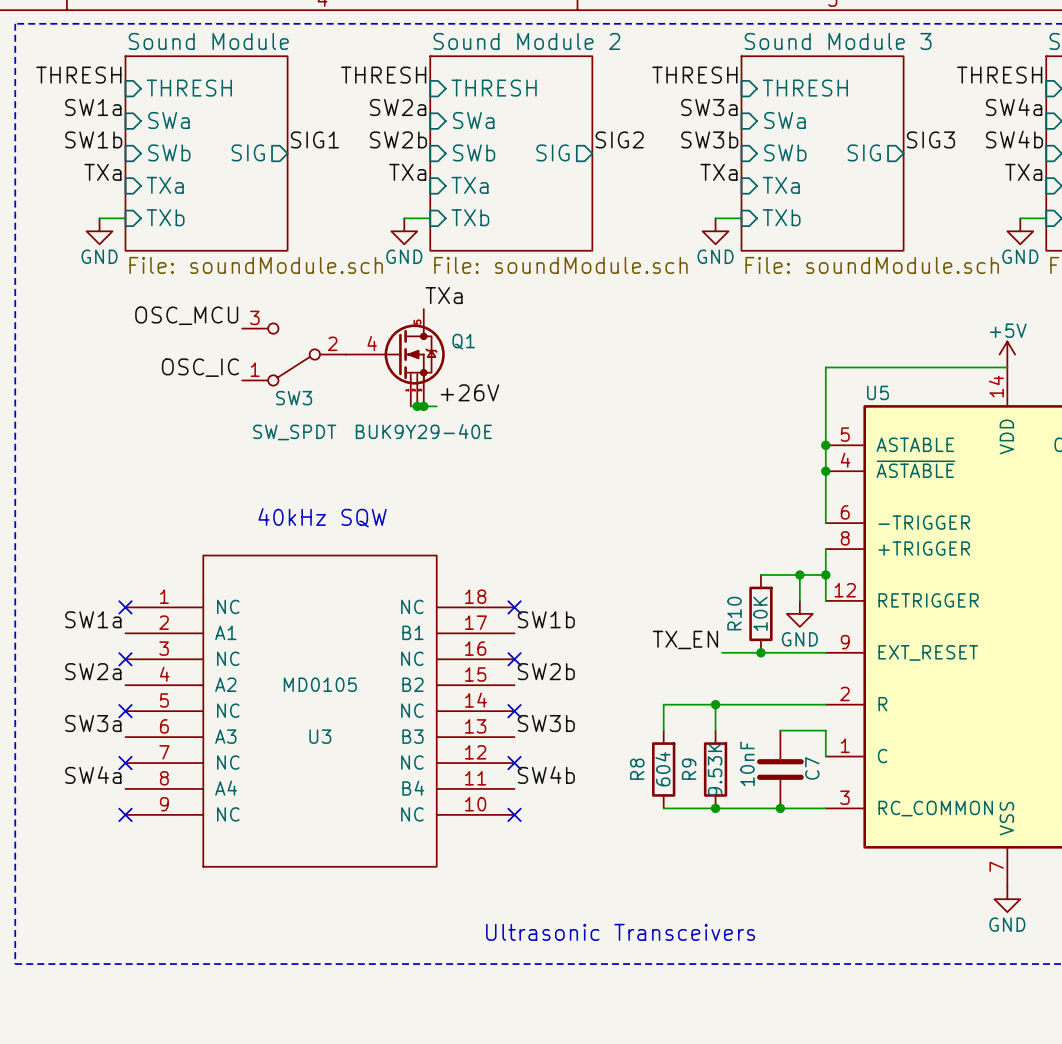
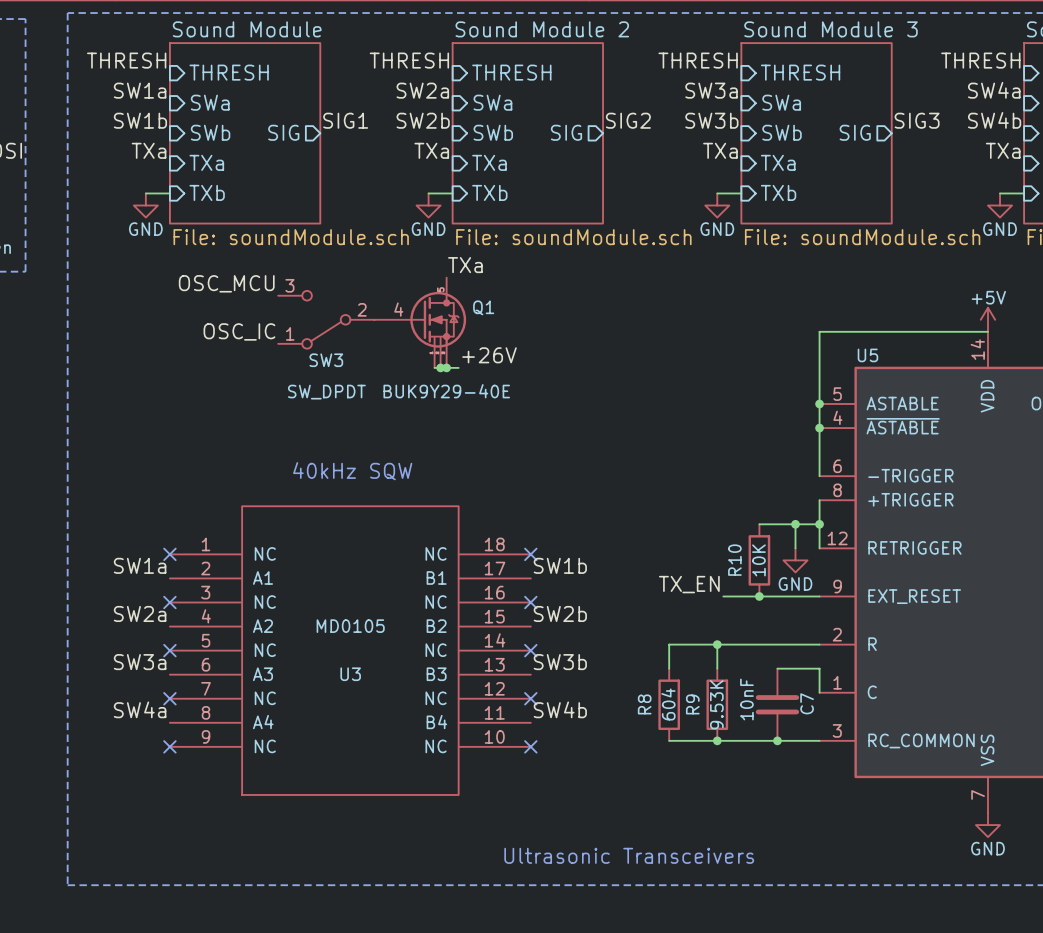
SW3 value: SW_SPDT (294, 432) -> SW_DPDT (326, 392)

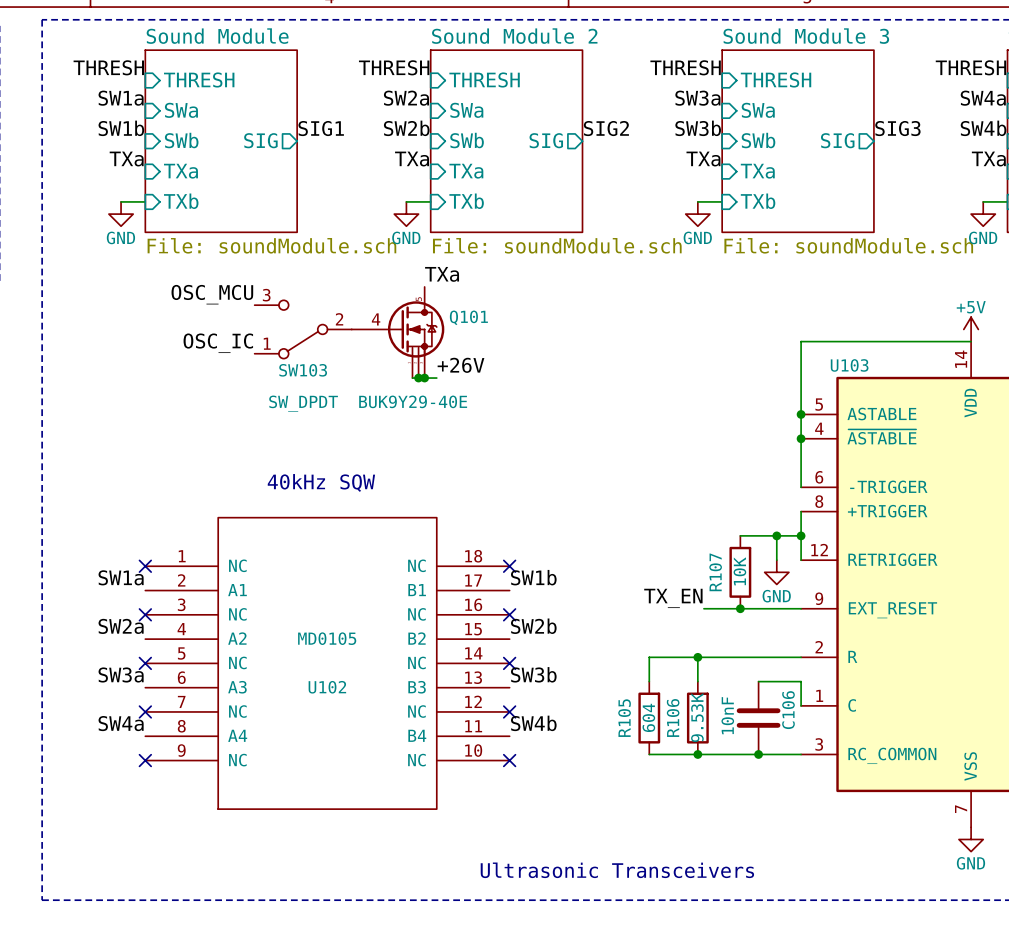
Q1 name: Q1 (483, 307) -> Q101 (468, 317)
U5 name: U5 (867, 355) -> U103 (849, 365)
SW3 name: SW3 (326, 360) -> SW103 (303, 370)
R10 name: R10 (734, 560) -> R107 (715, 572)
U3 name: U3 (350, 674) -> U102 (327, 687)
C7 name: C7 (807, 703) -> C106 (788, 710)
R8 name: R8 (644, 704) -> R105 (624, 718)
R9 name: R9 (692, 704) -> R106 (673, 718)

